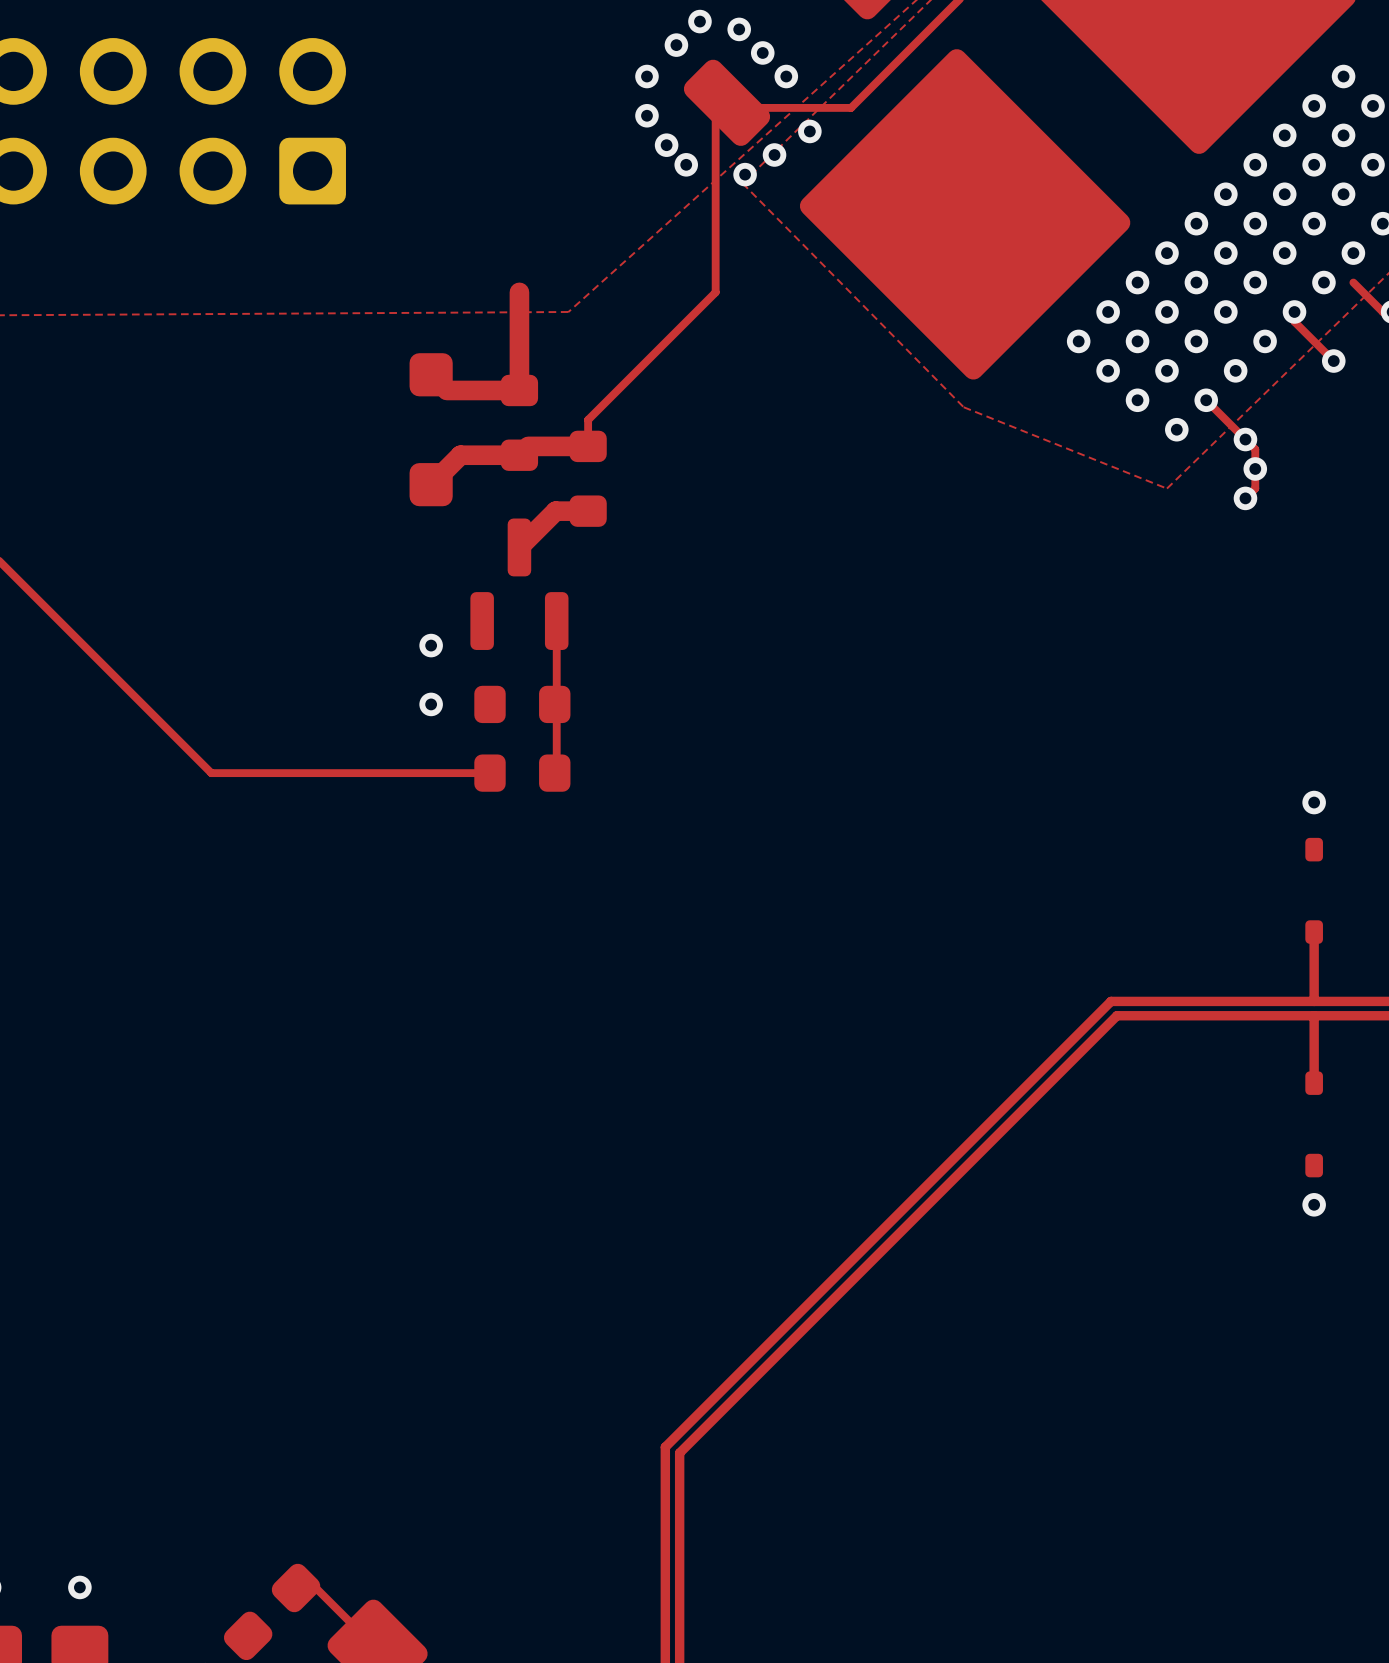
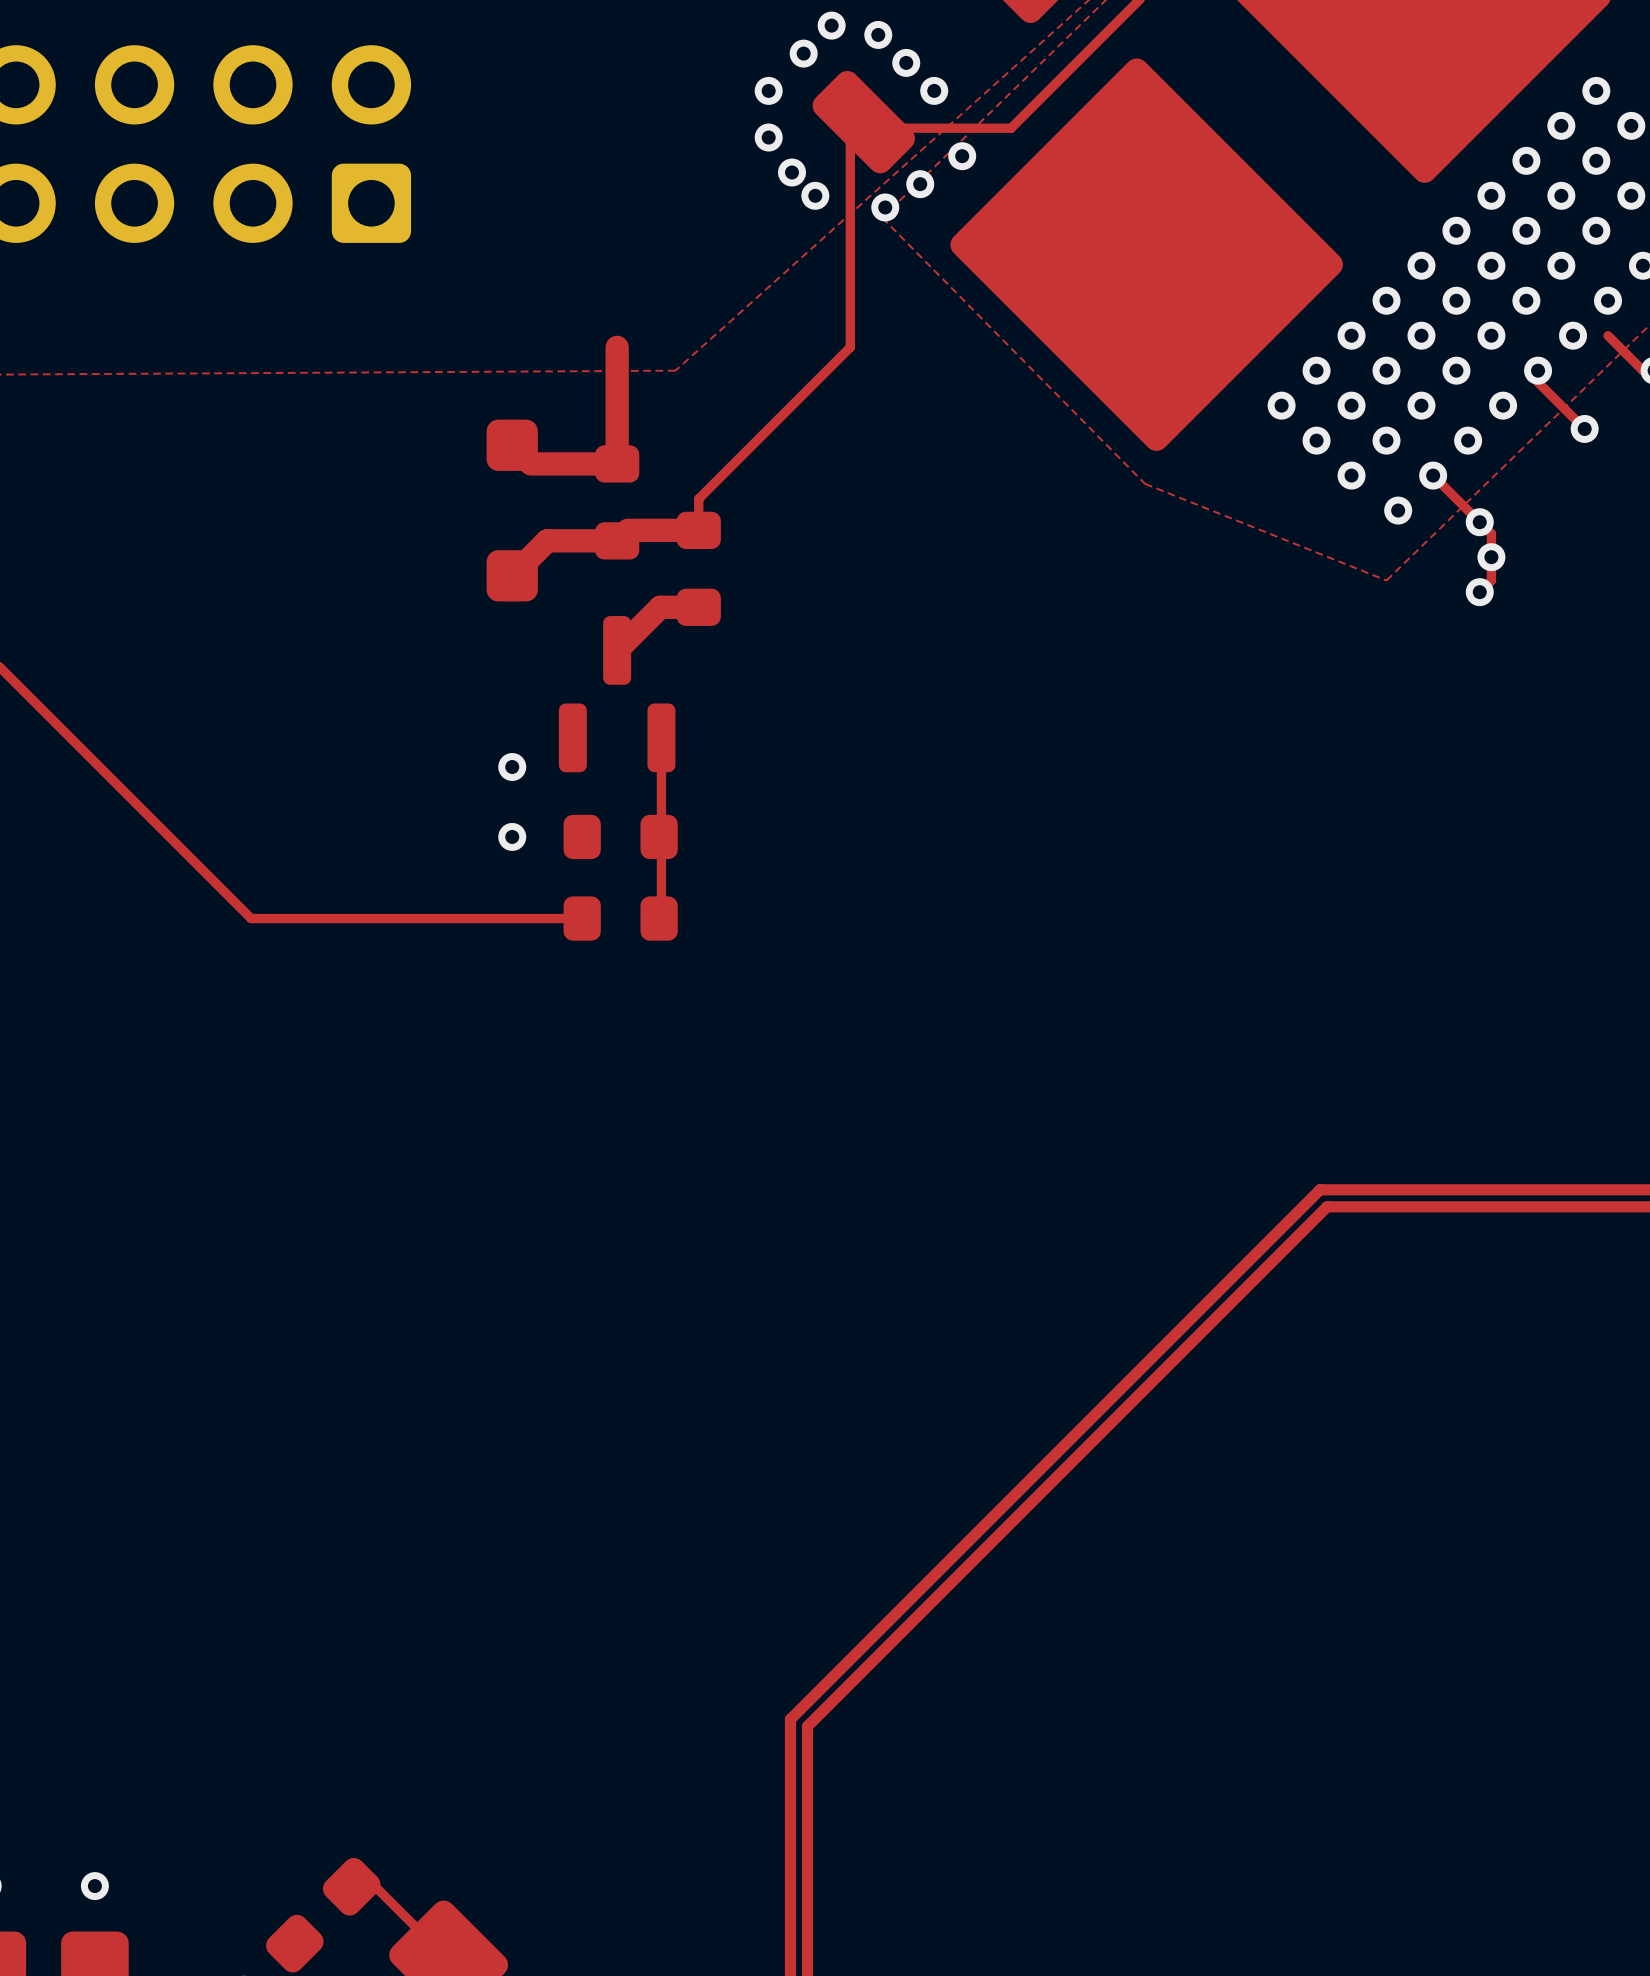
via: (1314, 802) -> none
part: (1314, 890) -> none
top track: (1314, 932) (1314, 1001) -> none
top track: (1314, 1015) (1314, 1083) -> none
part: (1314, 1124) -> none
via: (1314, 1204) -> none

